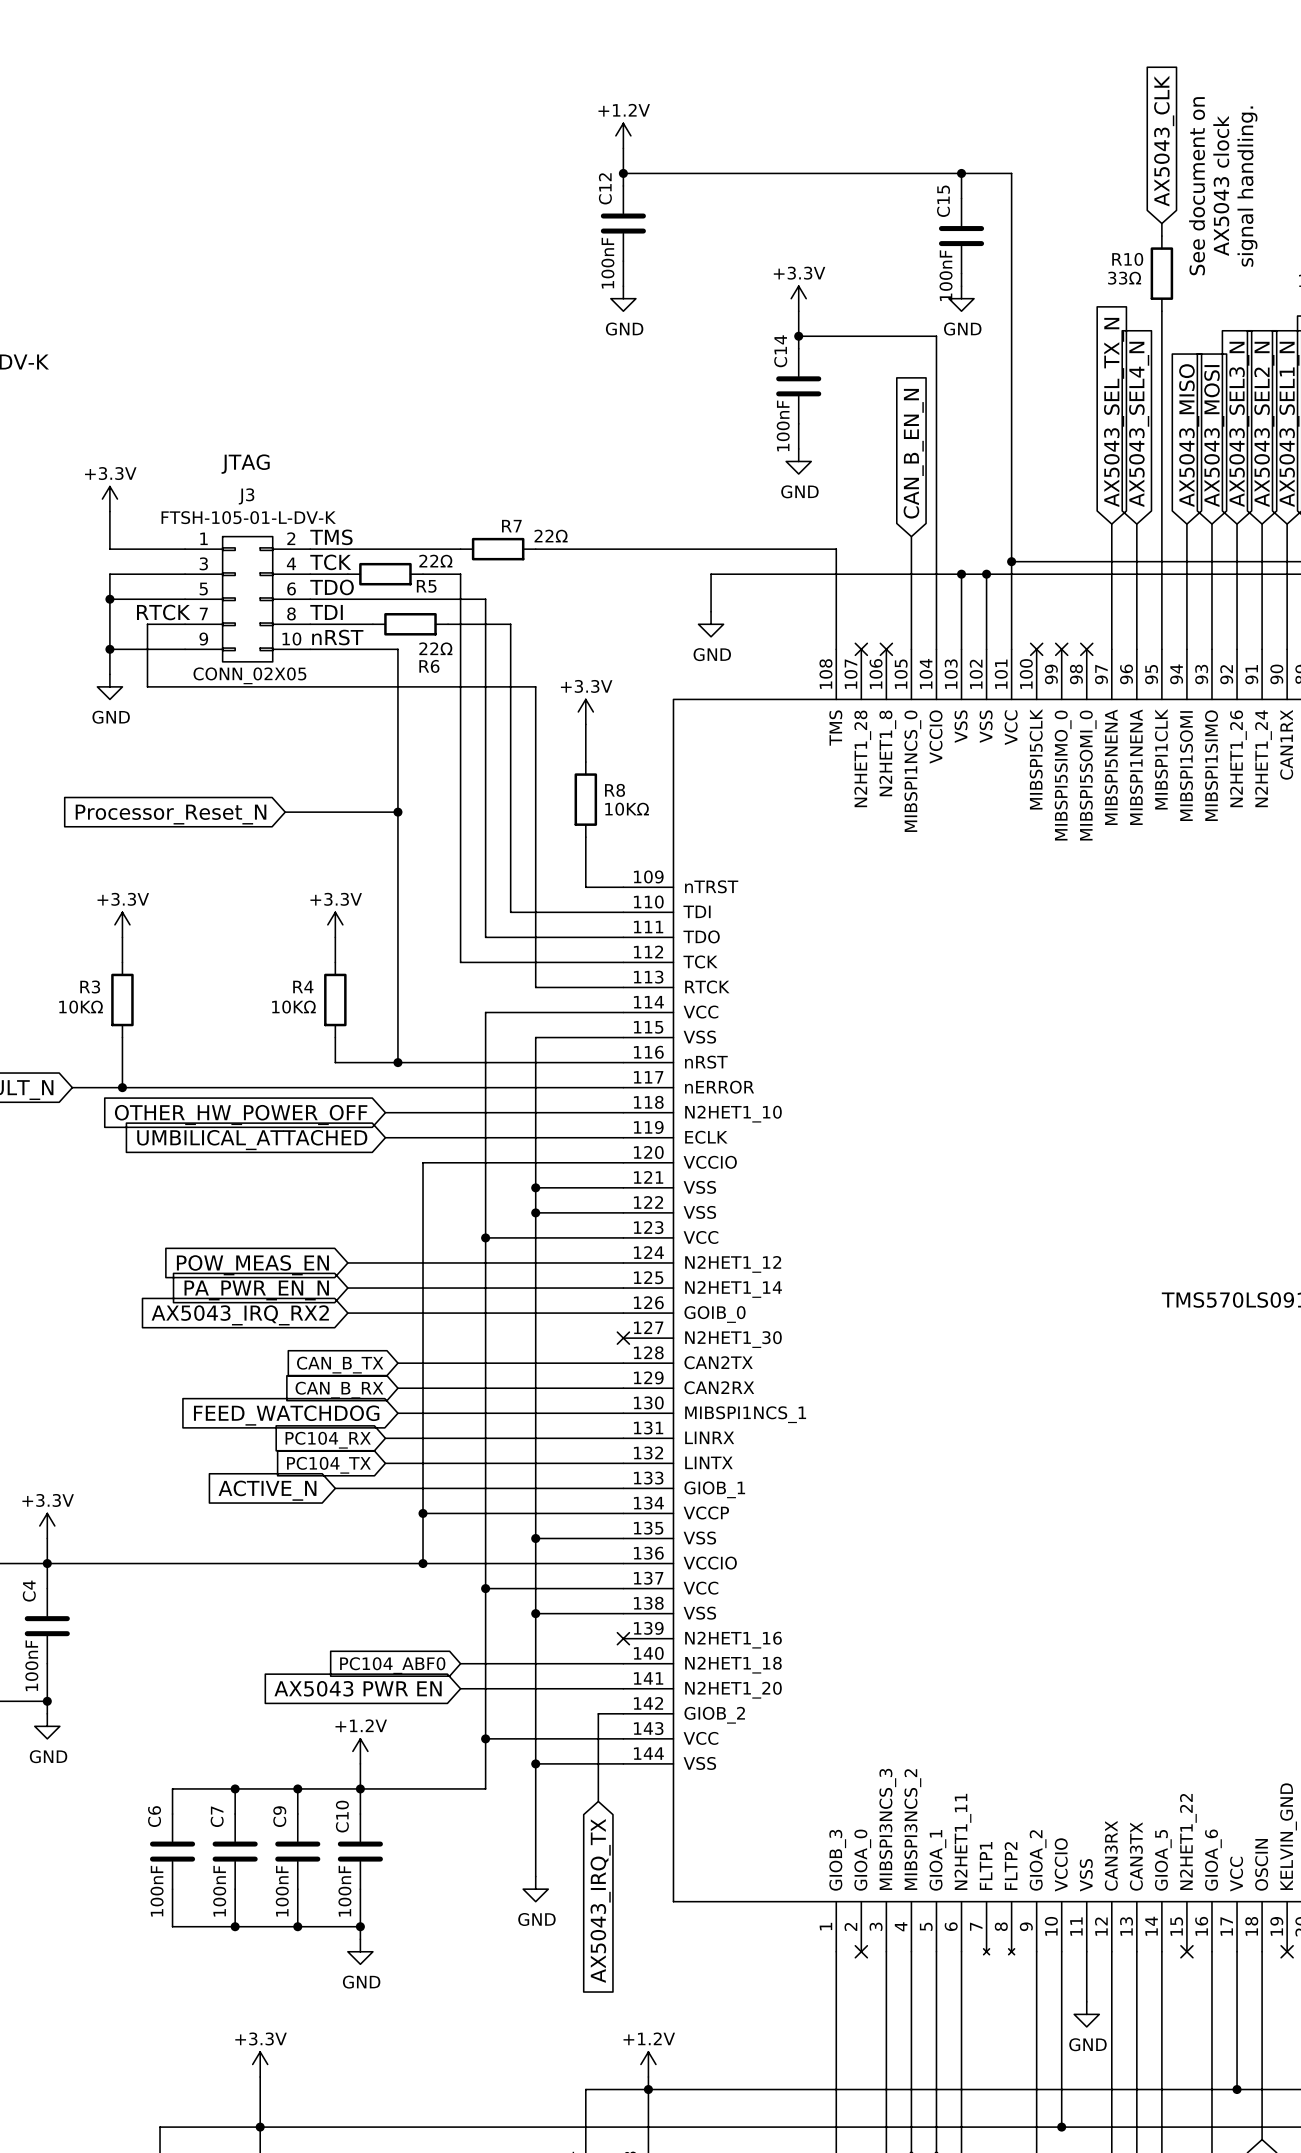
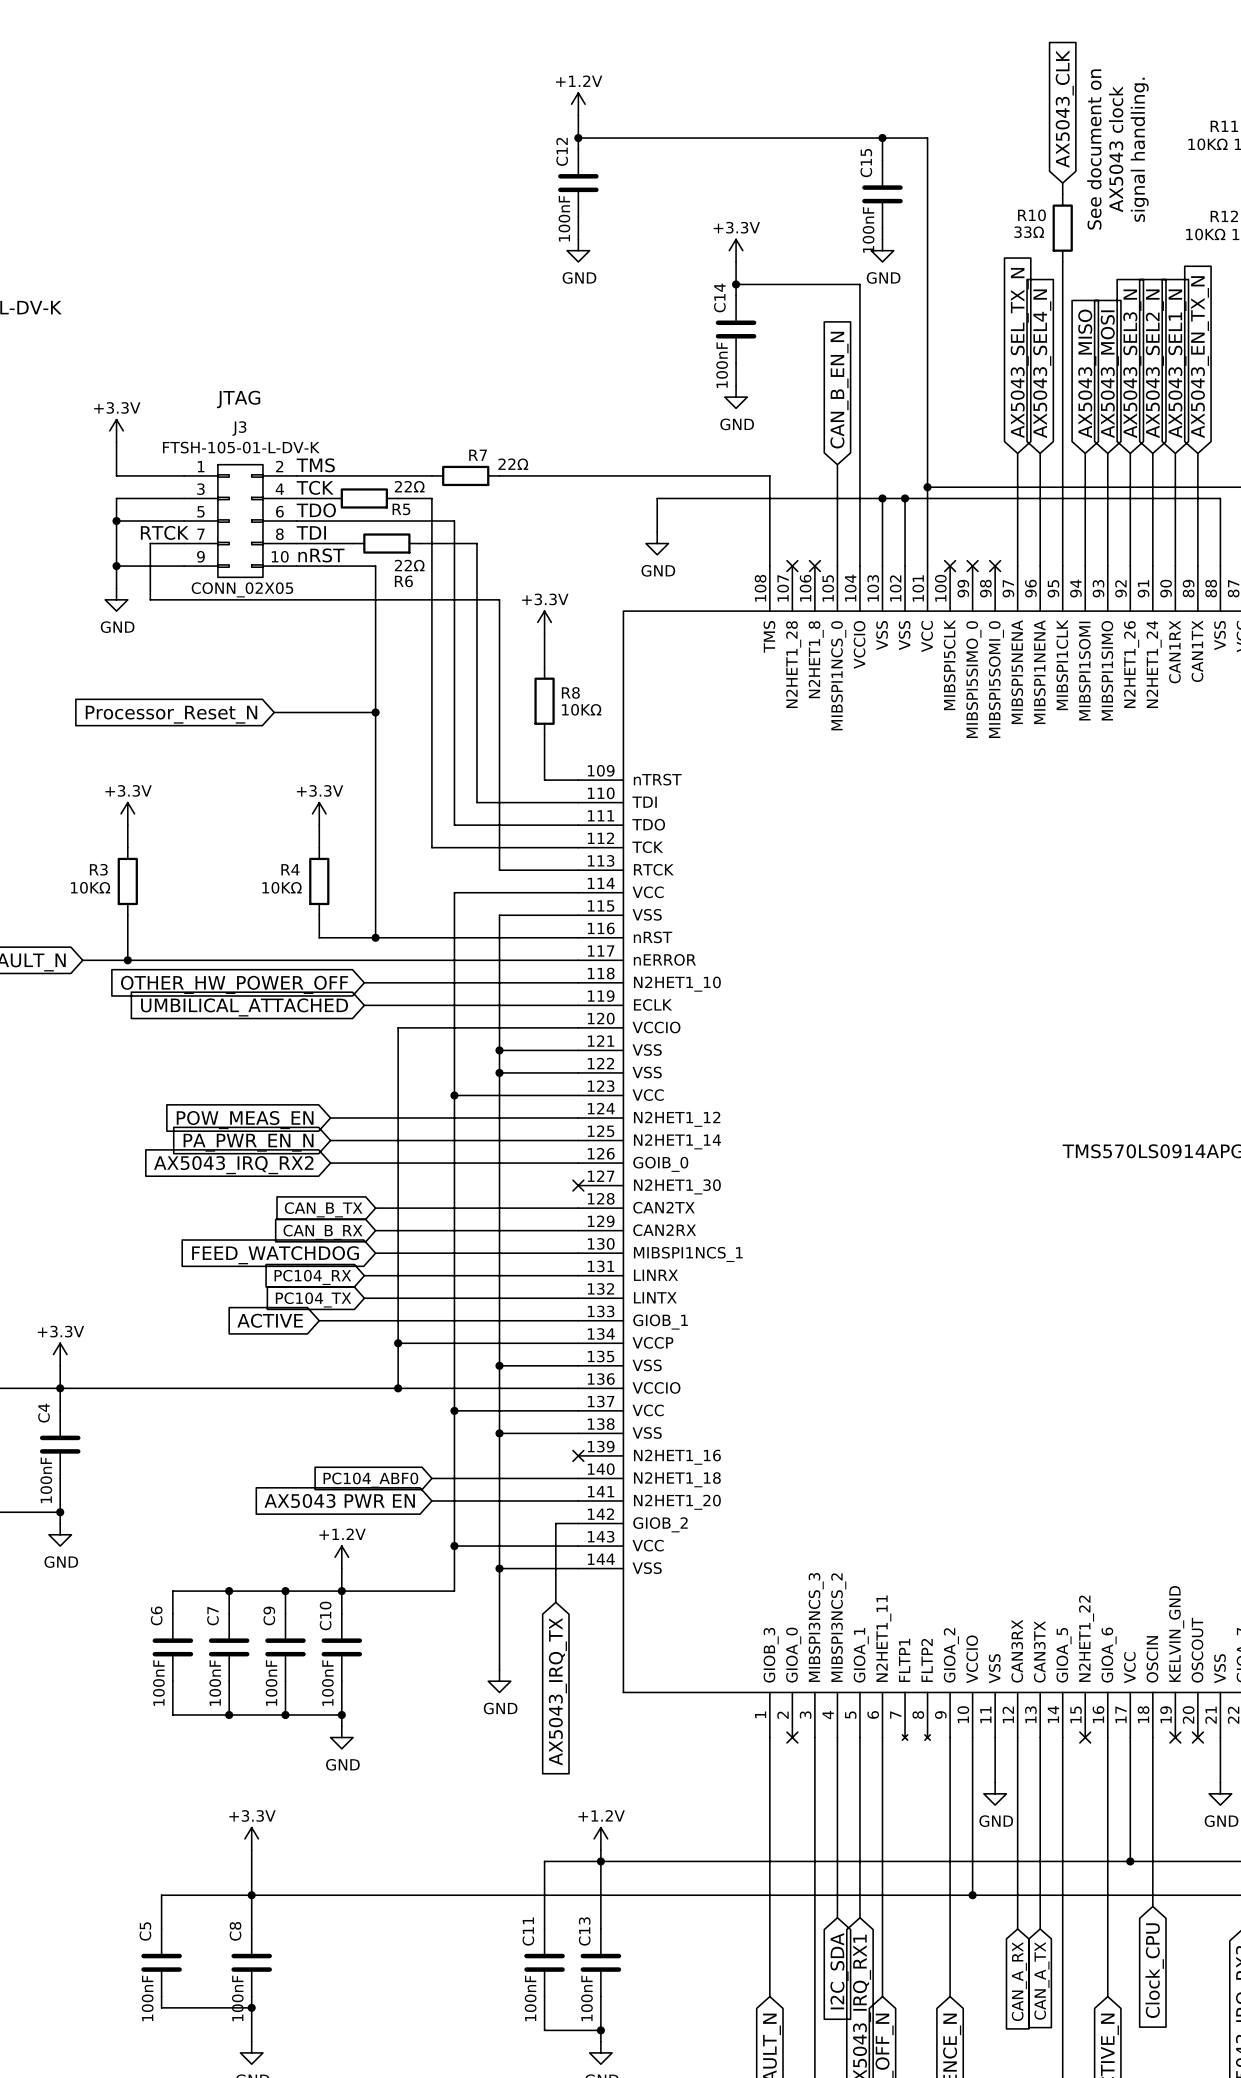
global label: ACTIVE_N (267, 1490) -> ACTIVE (270, 1320)

